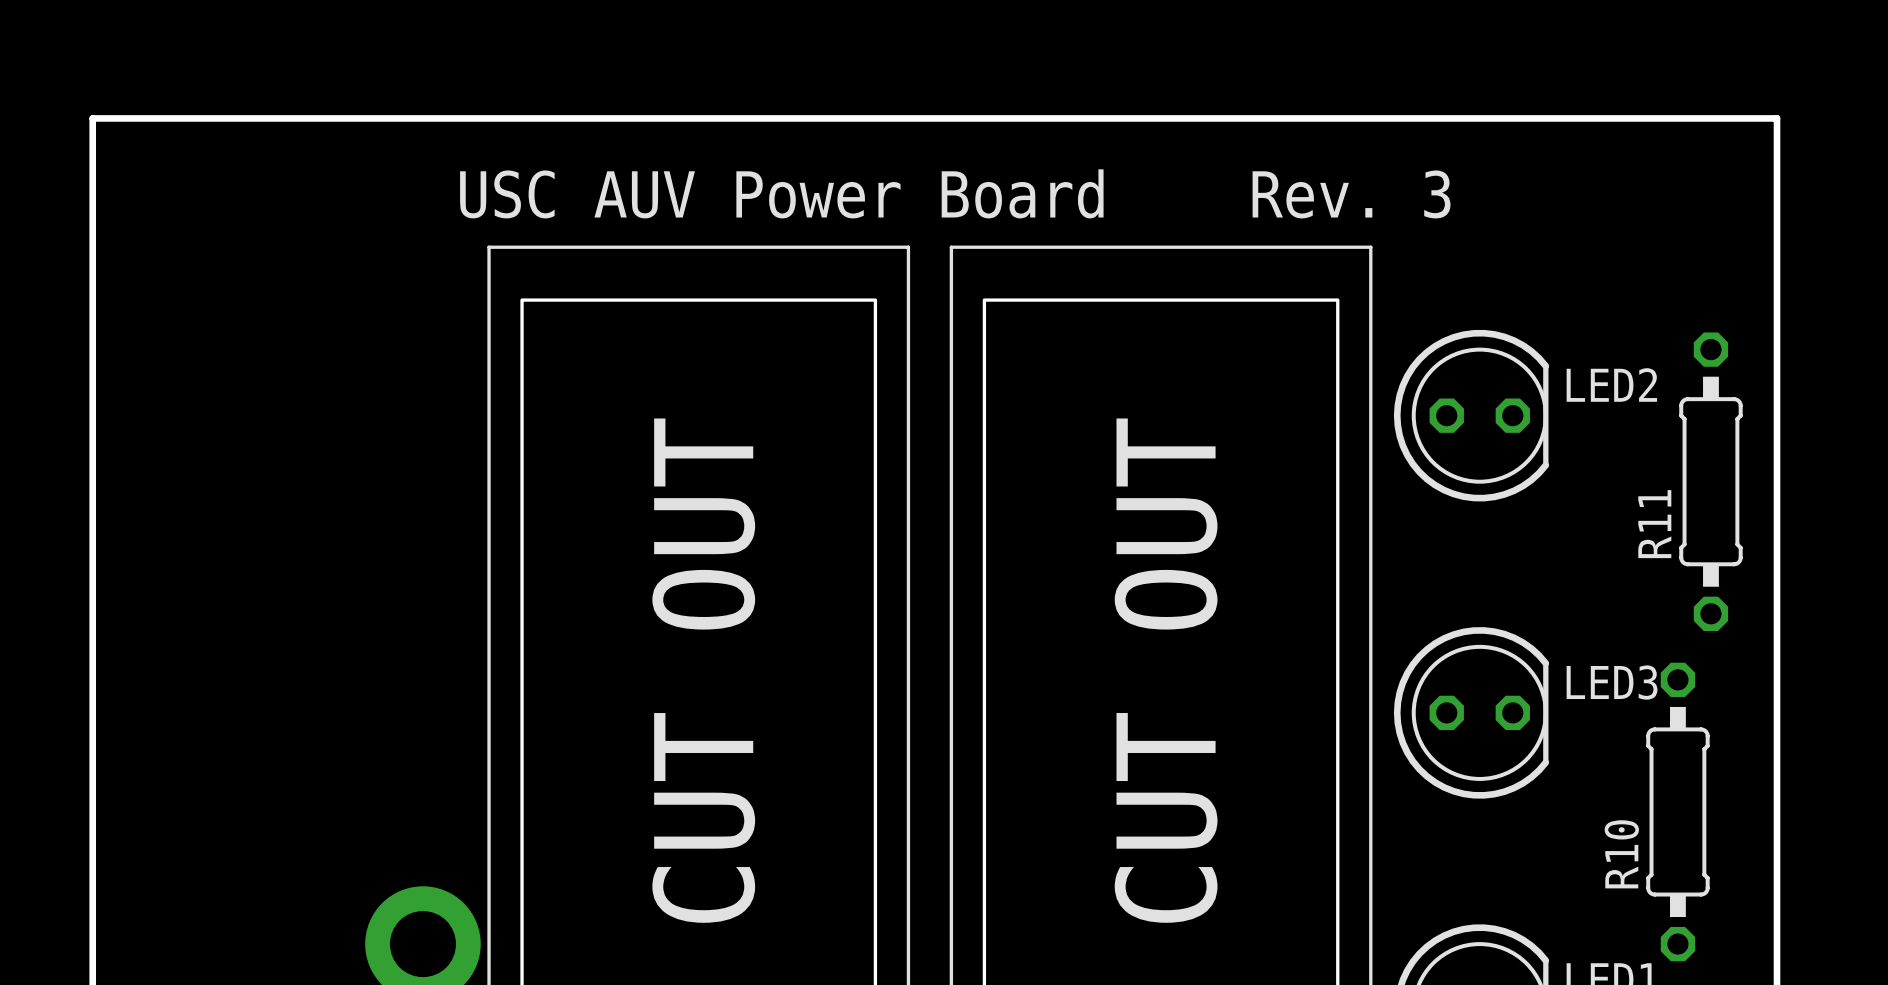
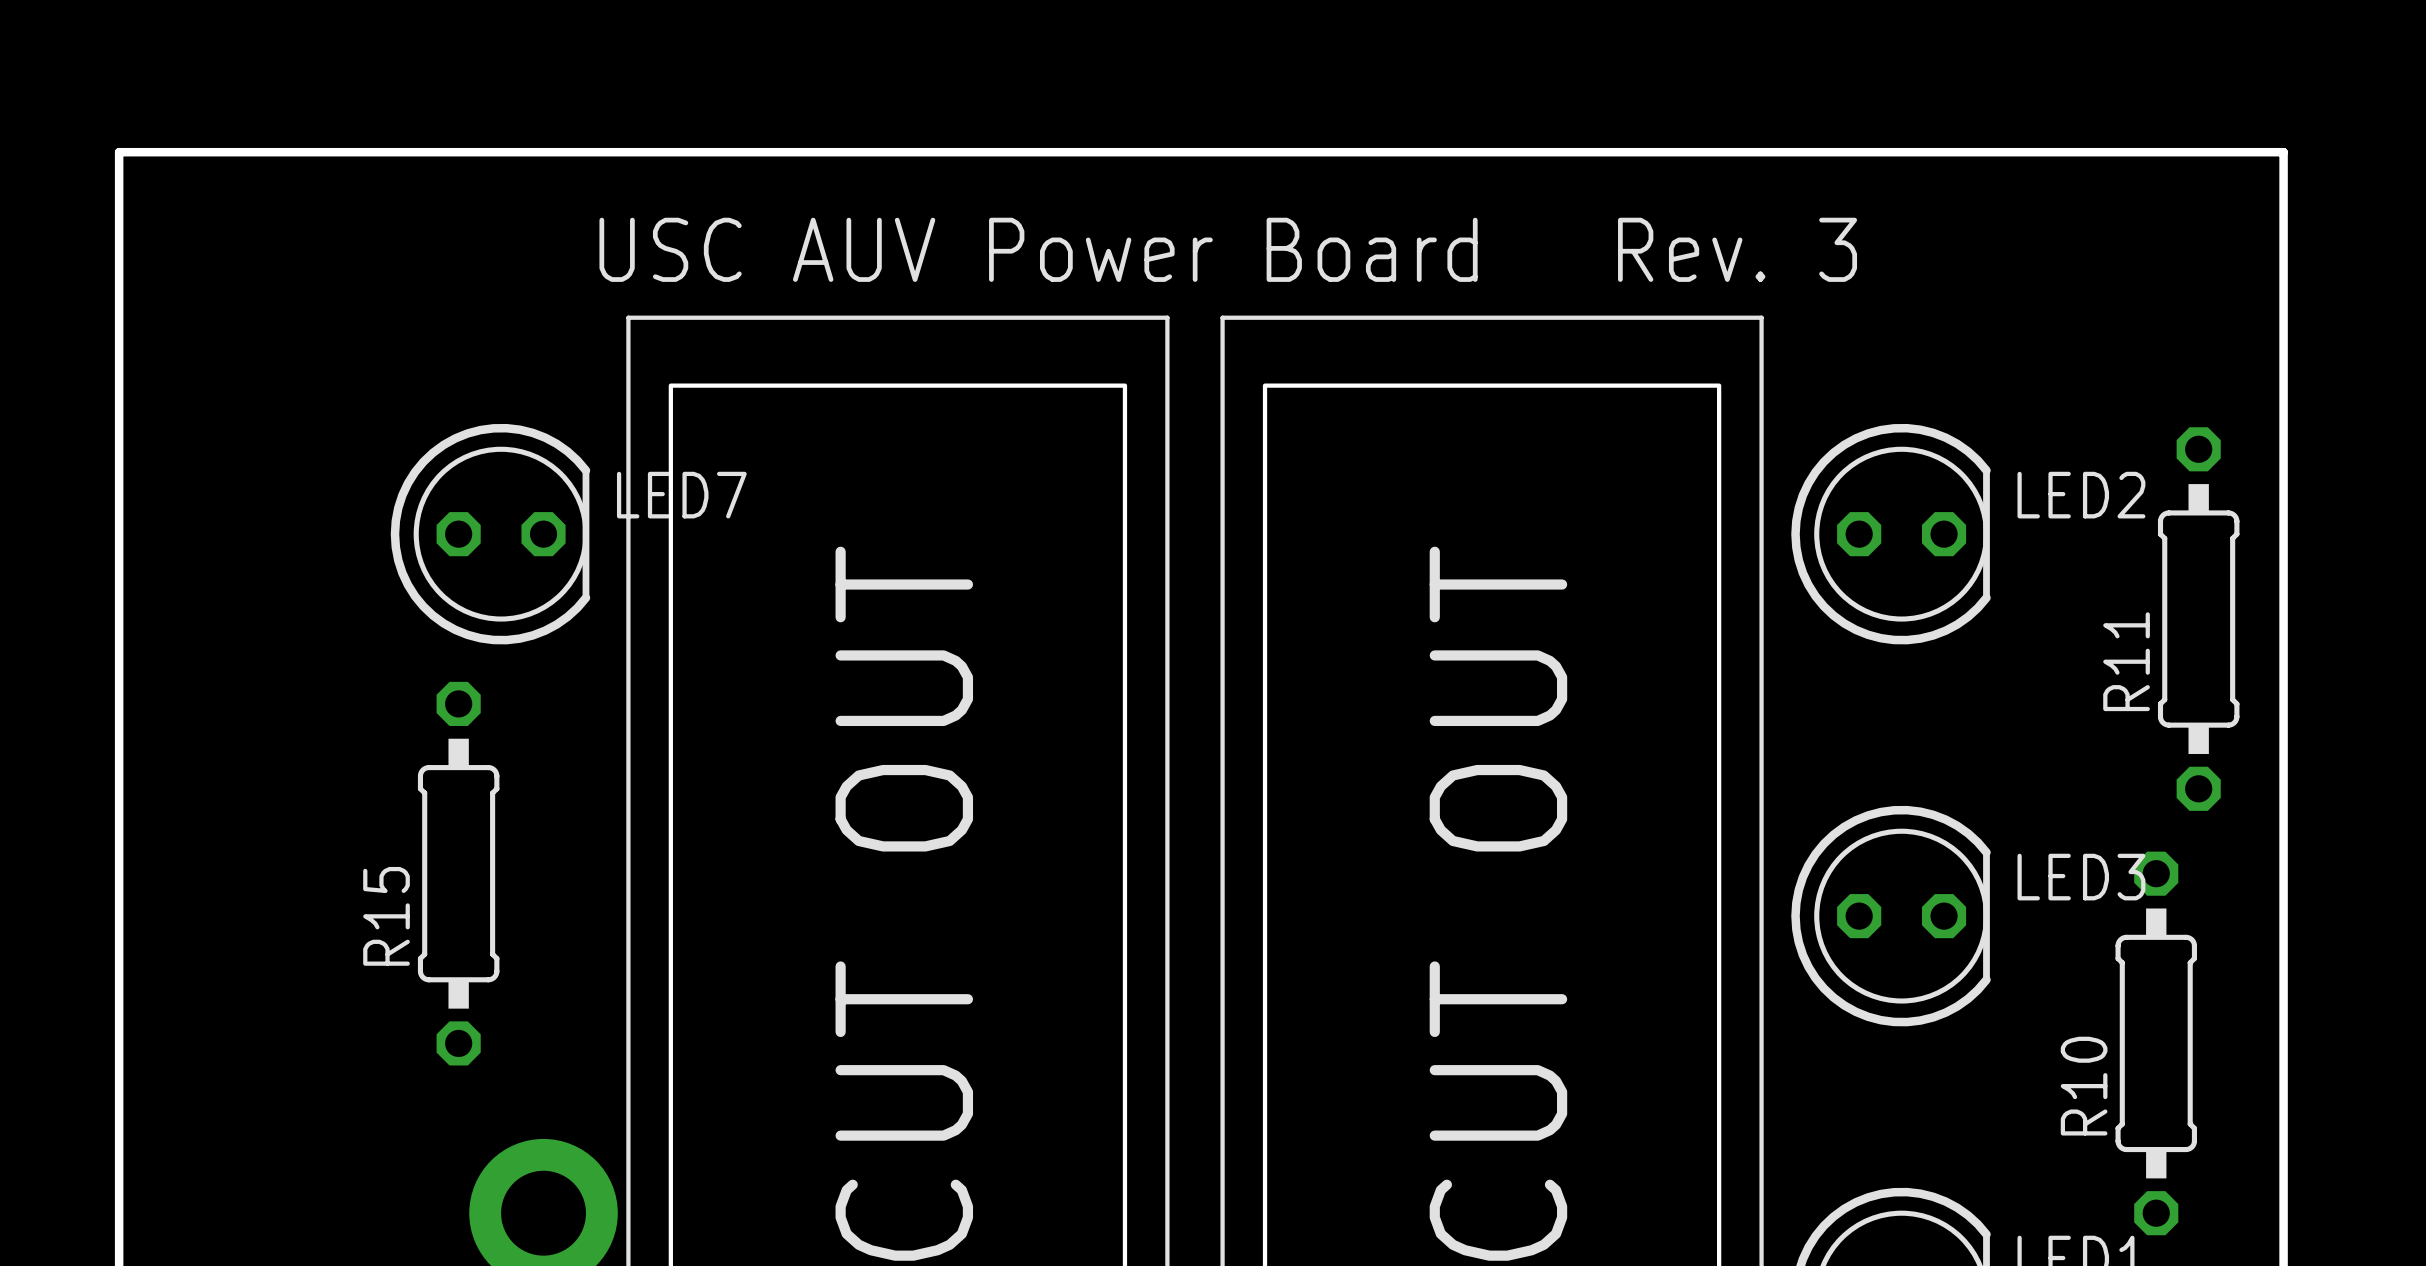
LED7: none -> (490, 534)
R15: none -> (458, 873)

